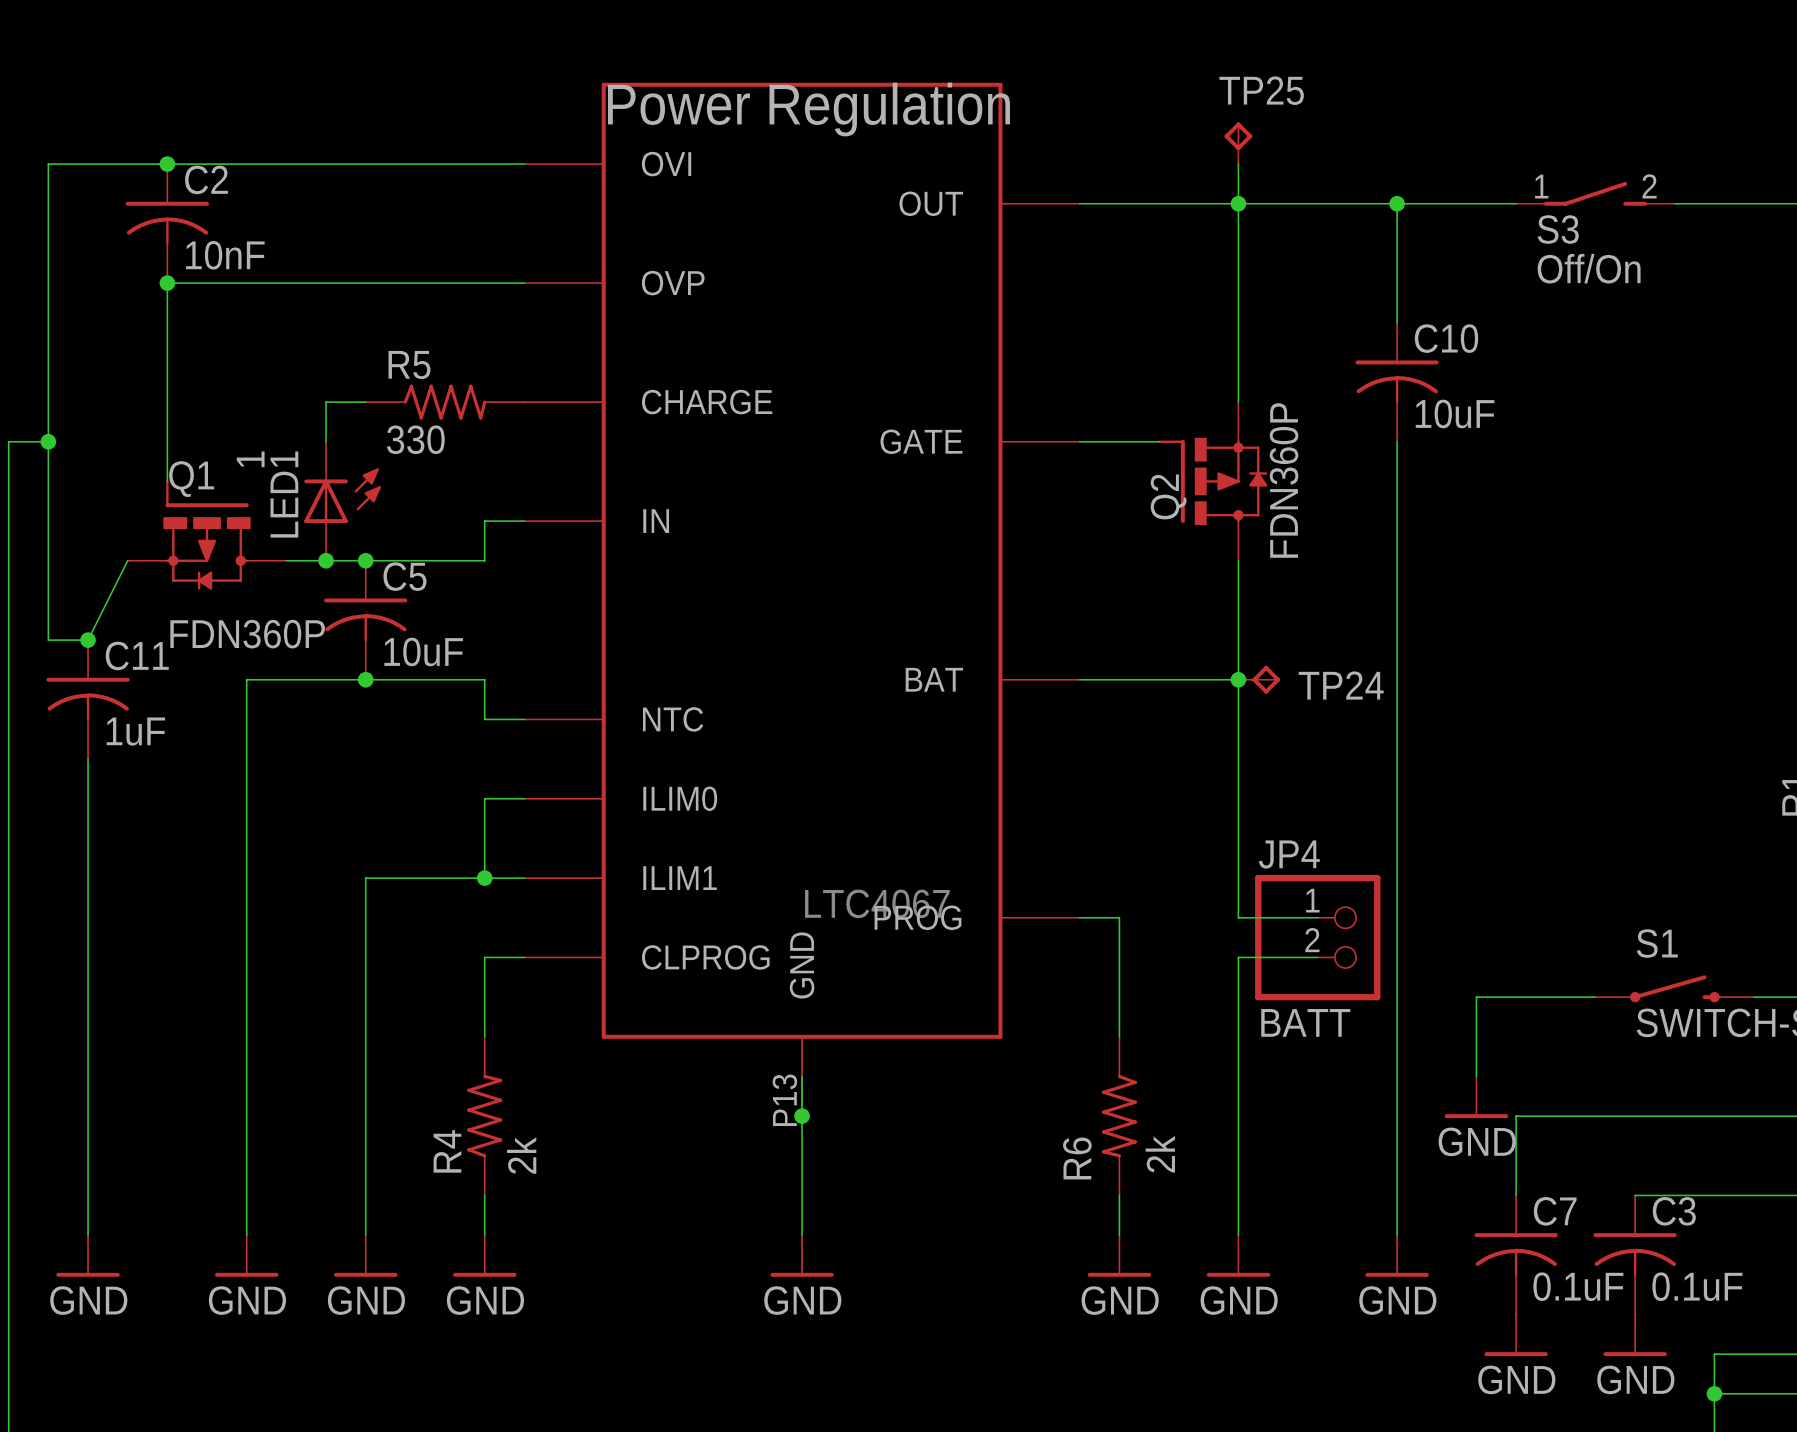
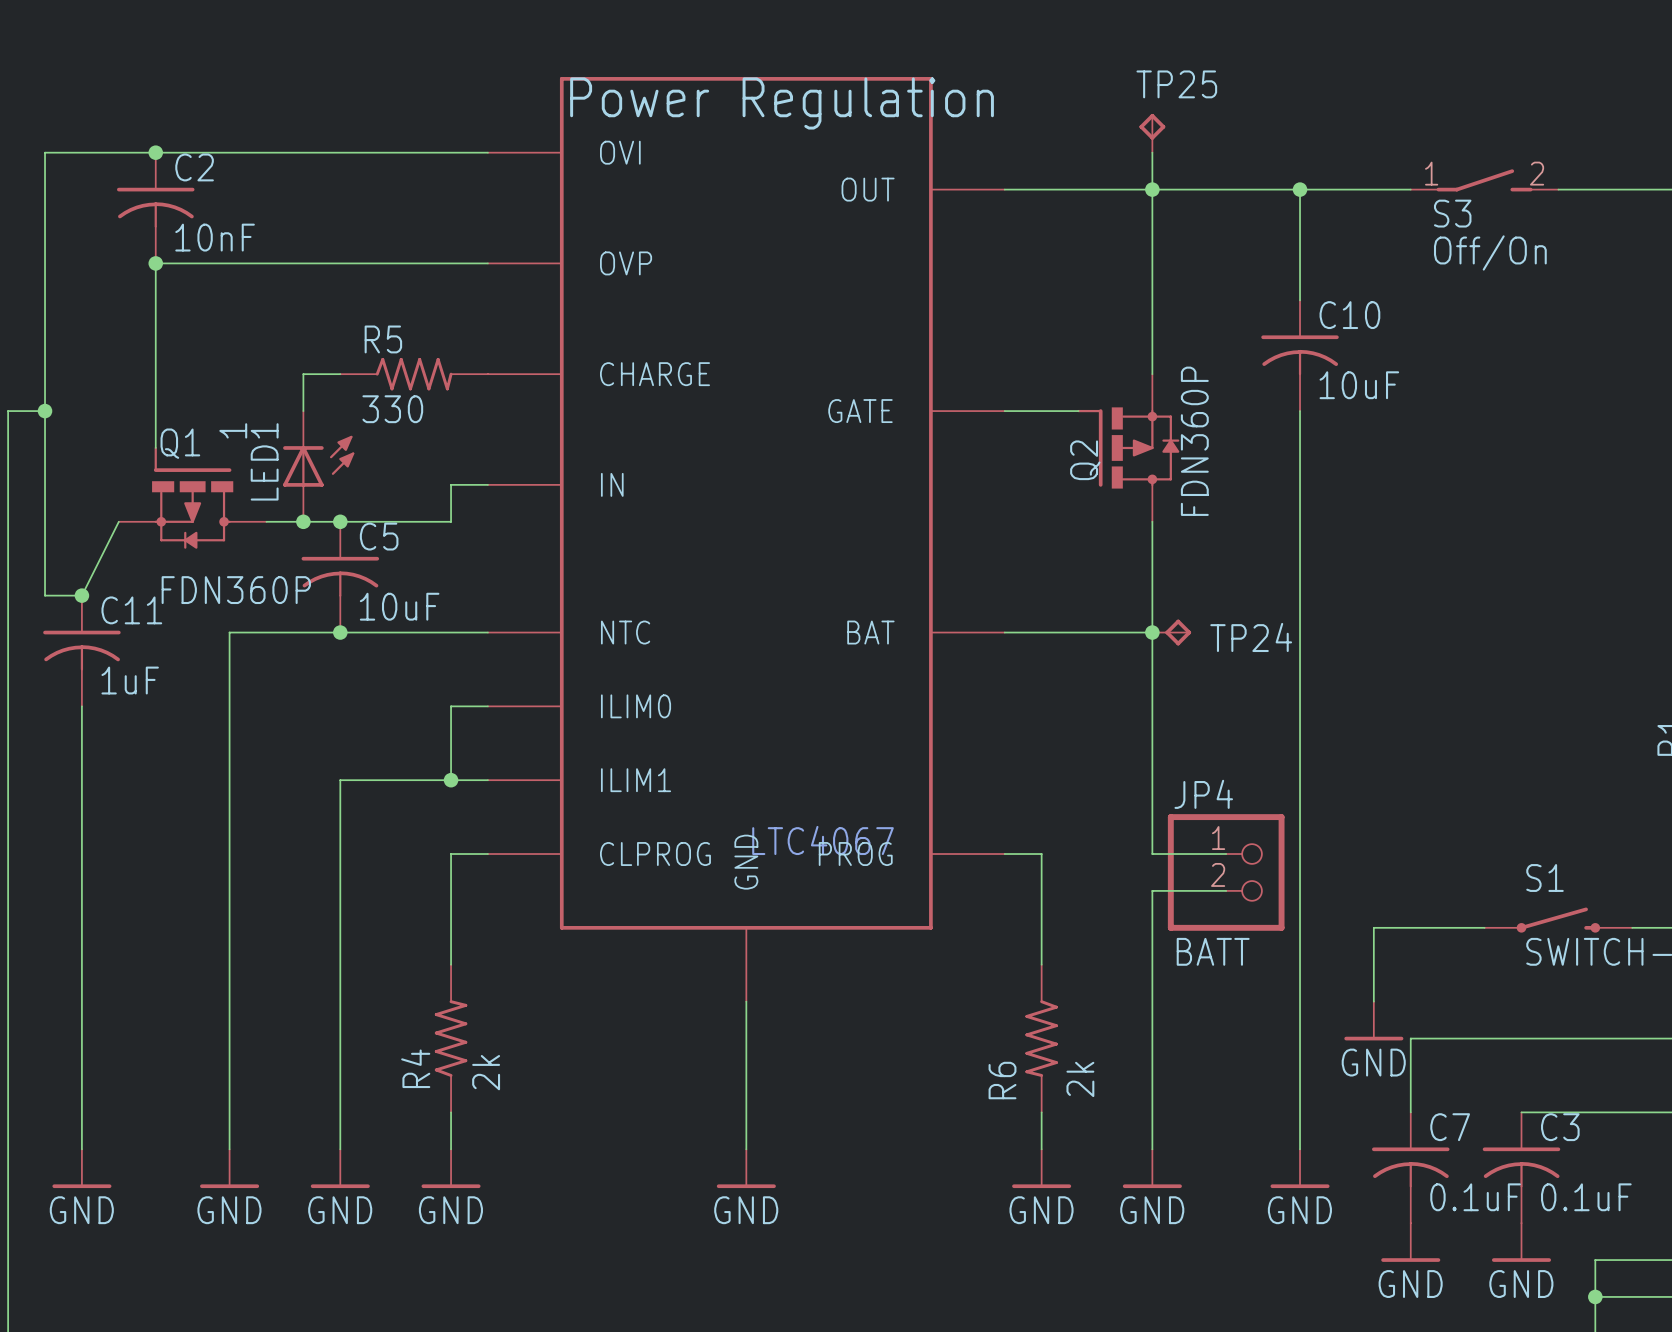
part: none -> (746, 539)
part: (802, 599) -> none
wire: (484, 679) (484, 719) (524, 719) -> (451, 632) (487, 632)
wire: (484, 798) (524, 798) -> (451, 743) (451, 706) (487, 706)
wire: (484, 838) (484, 878) -> none
wire: (365, 878) (524, 878) -> (340, 817) (340, 780) (487, 780)
junction position: (484, 878) -> (451, 780)
wire: (484, 957) (524, 957) -> (451, 890) (451, 854) (487, 854)
junction: (802, 1116) -> none

